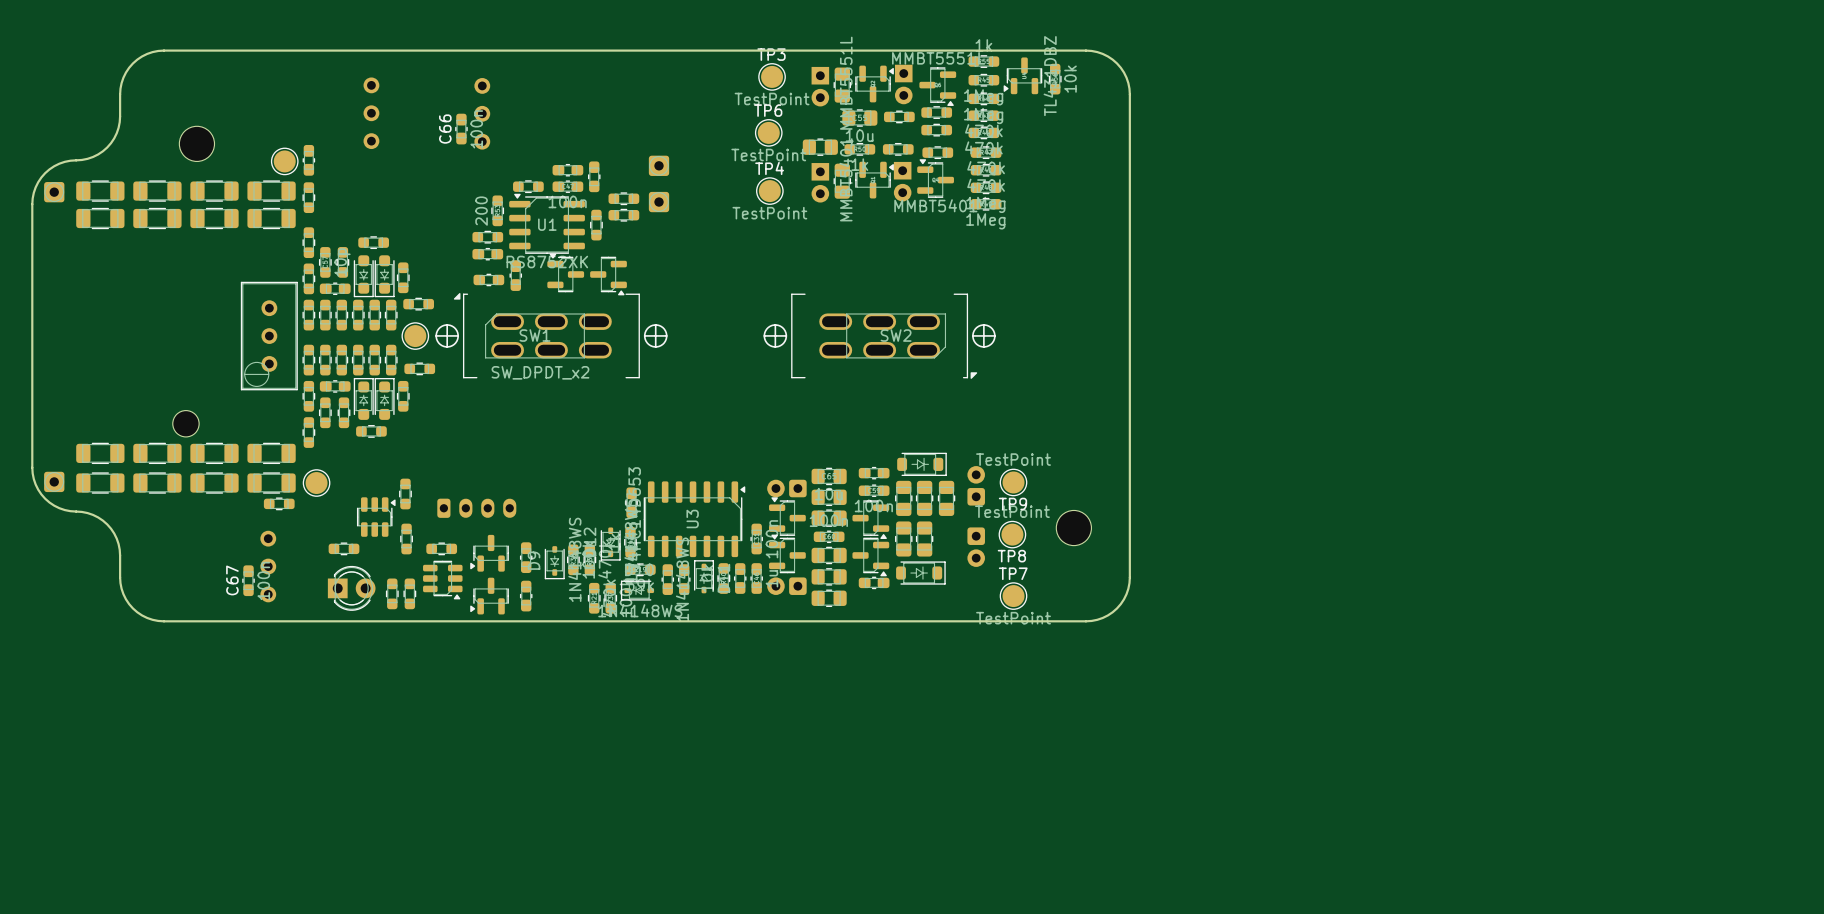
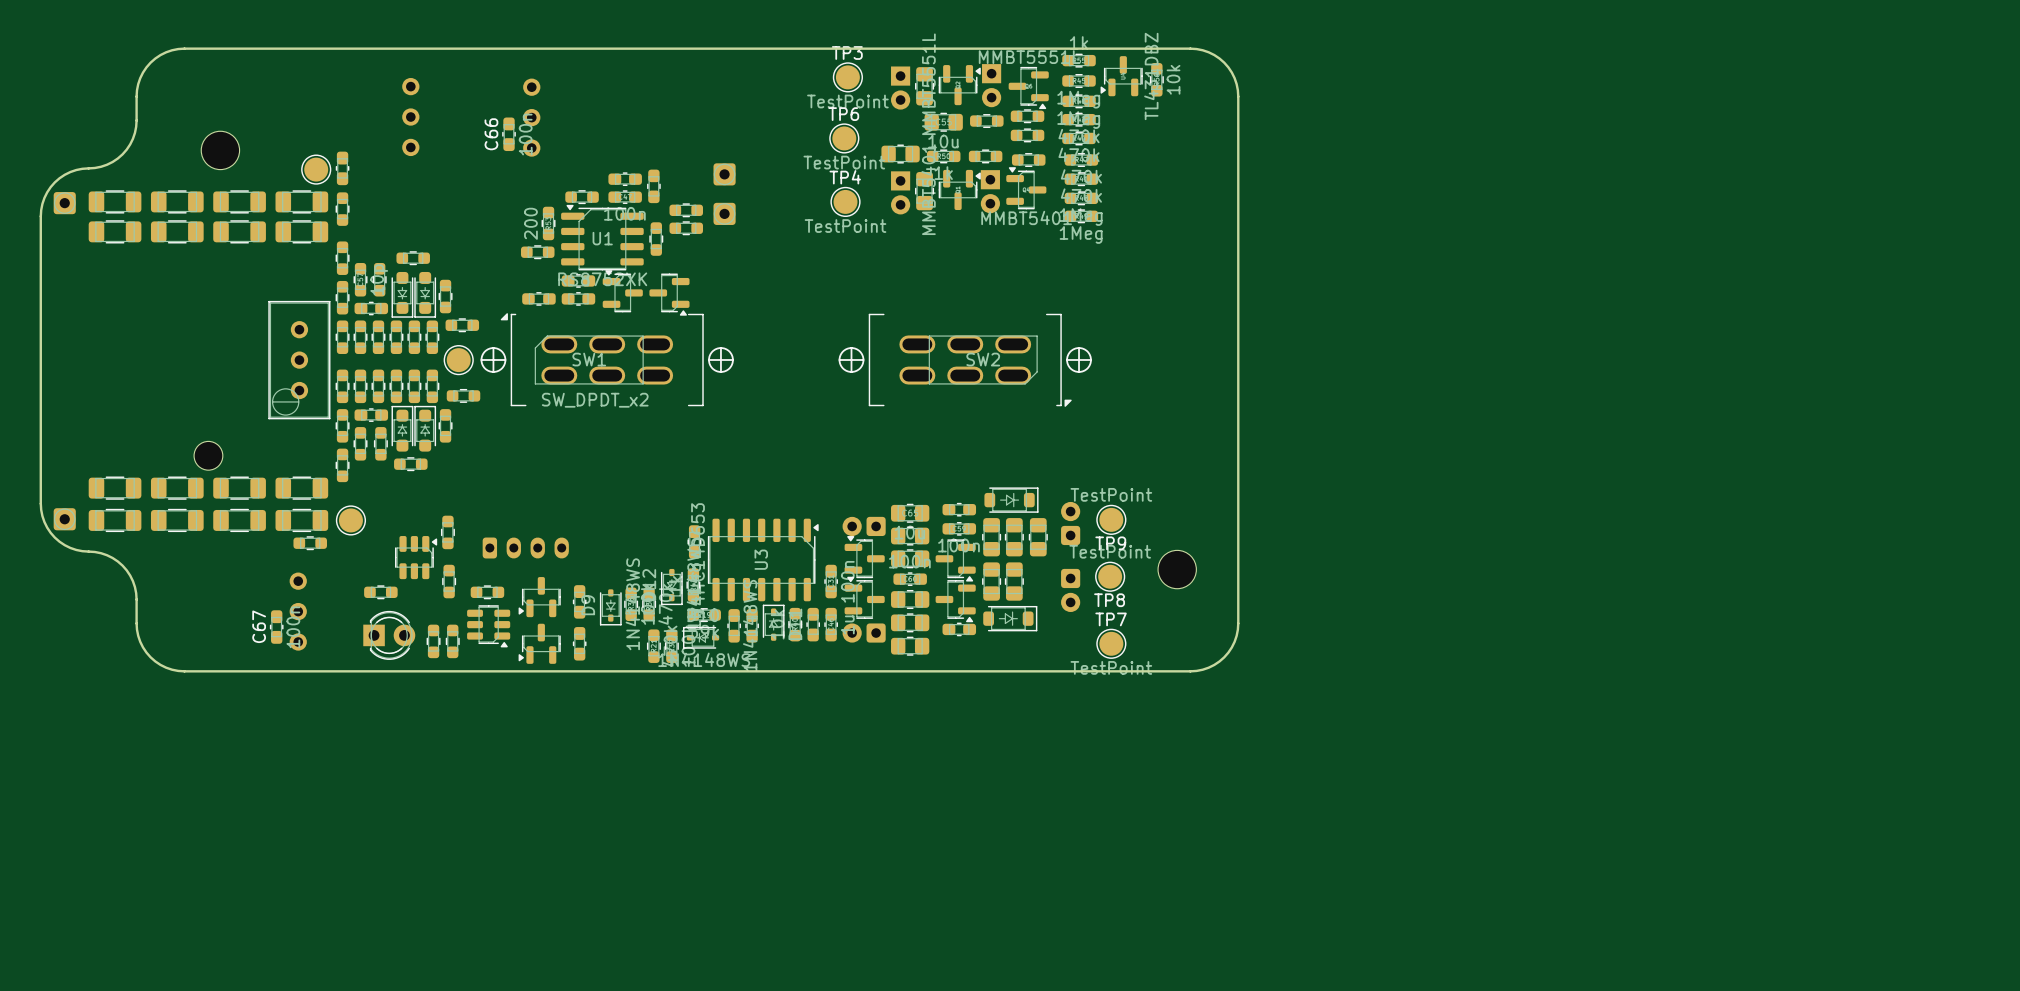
part: (487, 254) -> none
part: none -> (578, 280)
part: (515, 275) -> none
part: none -> (578, 298)

